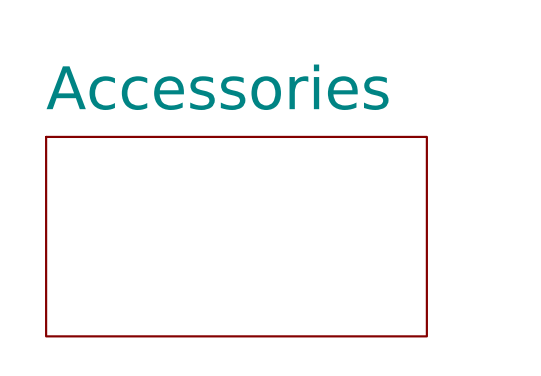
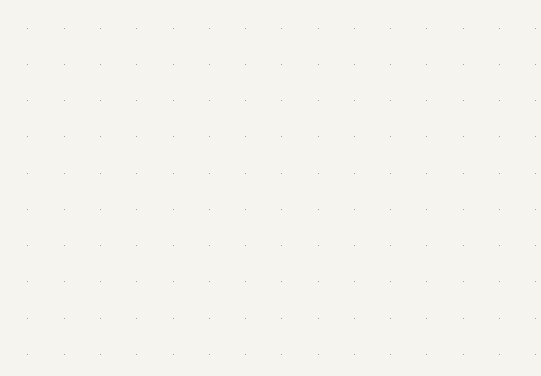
sheet Accessories: (236, 236) -> none

